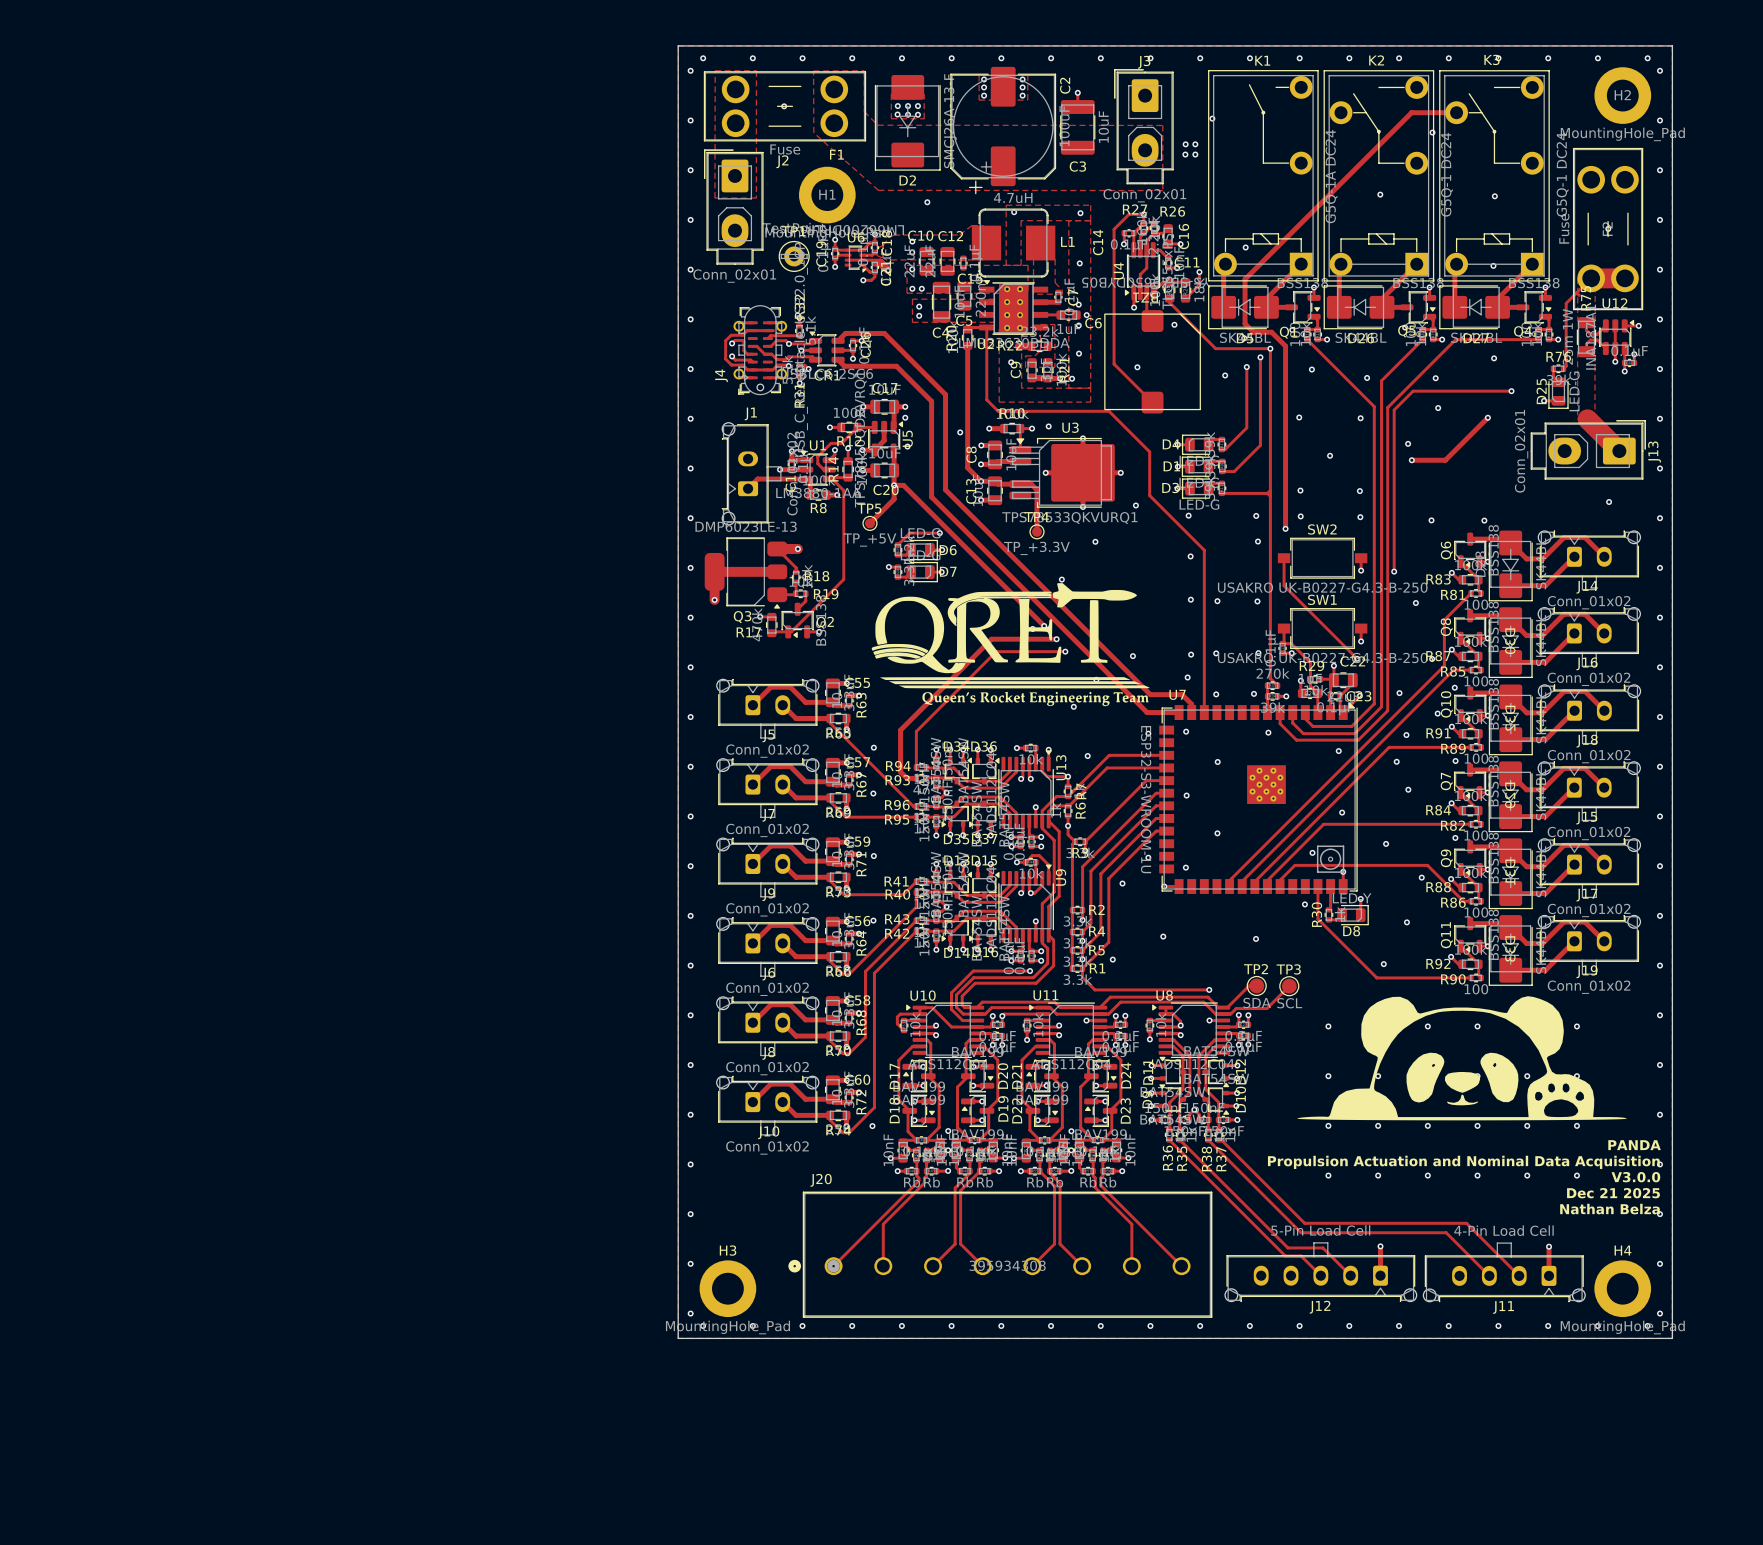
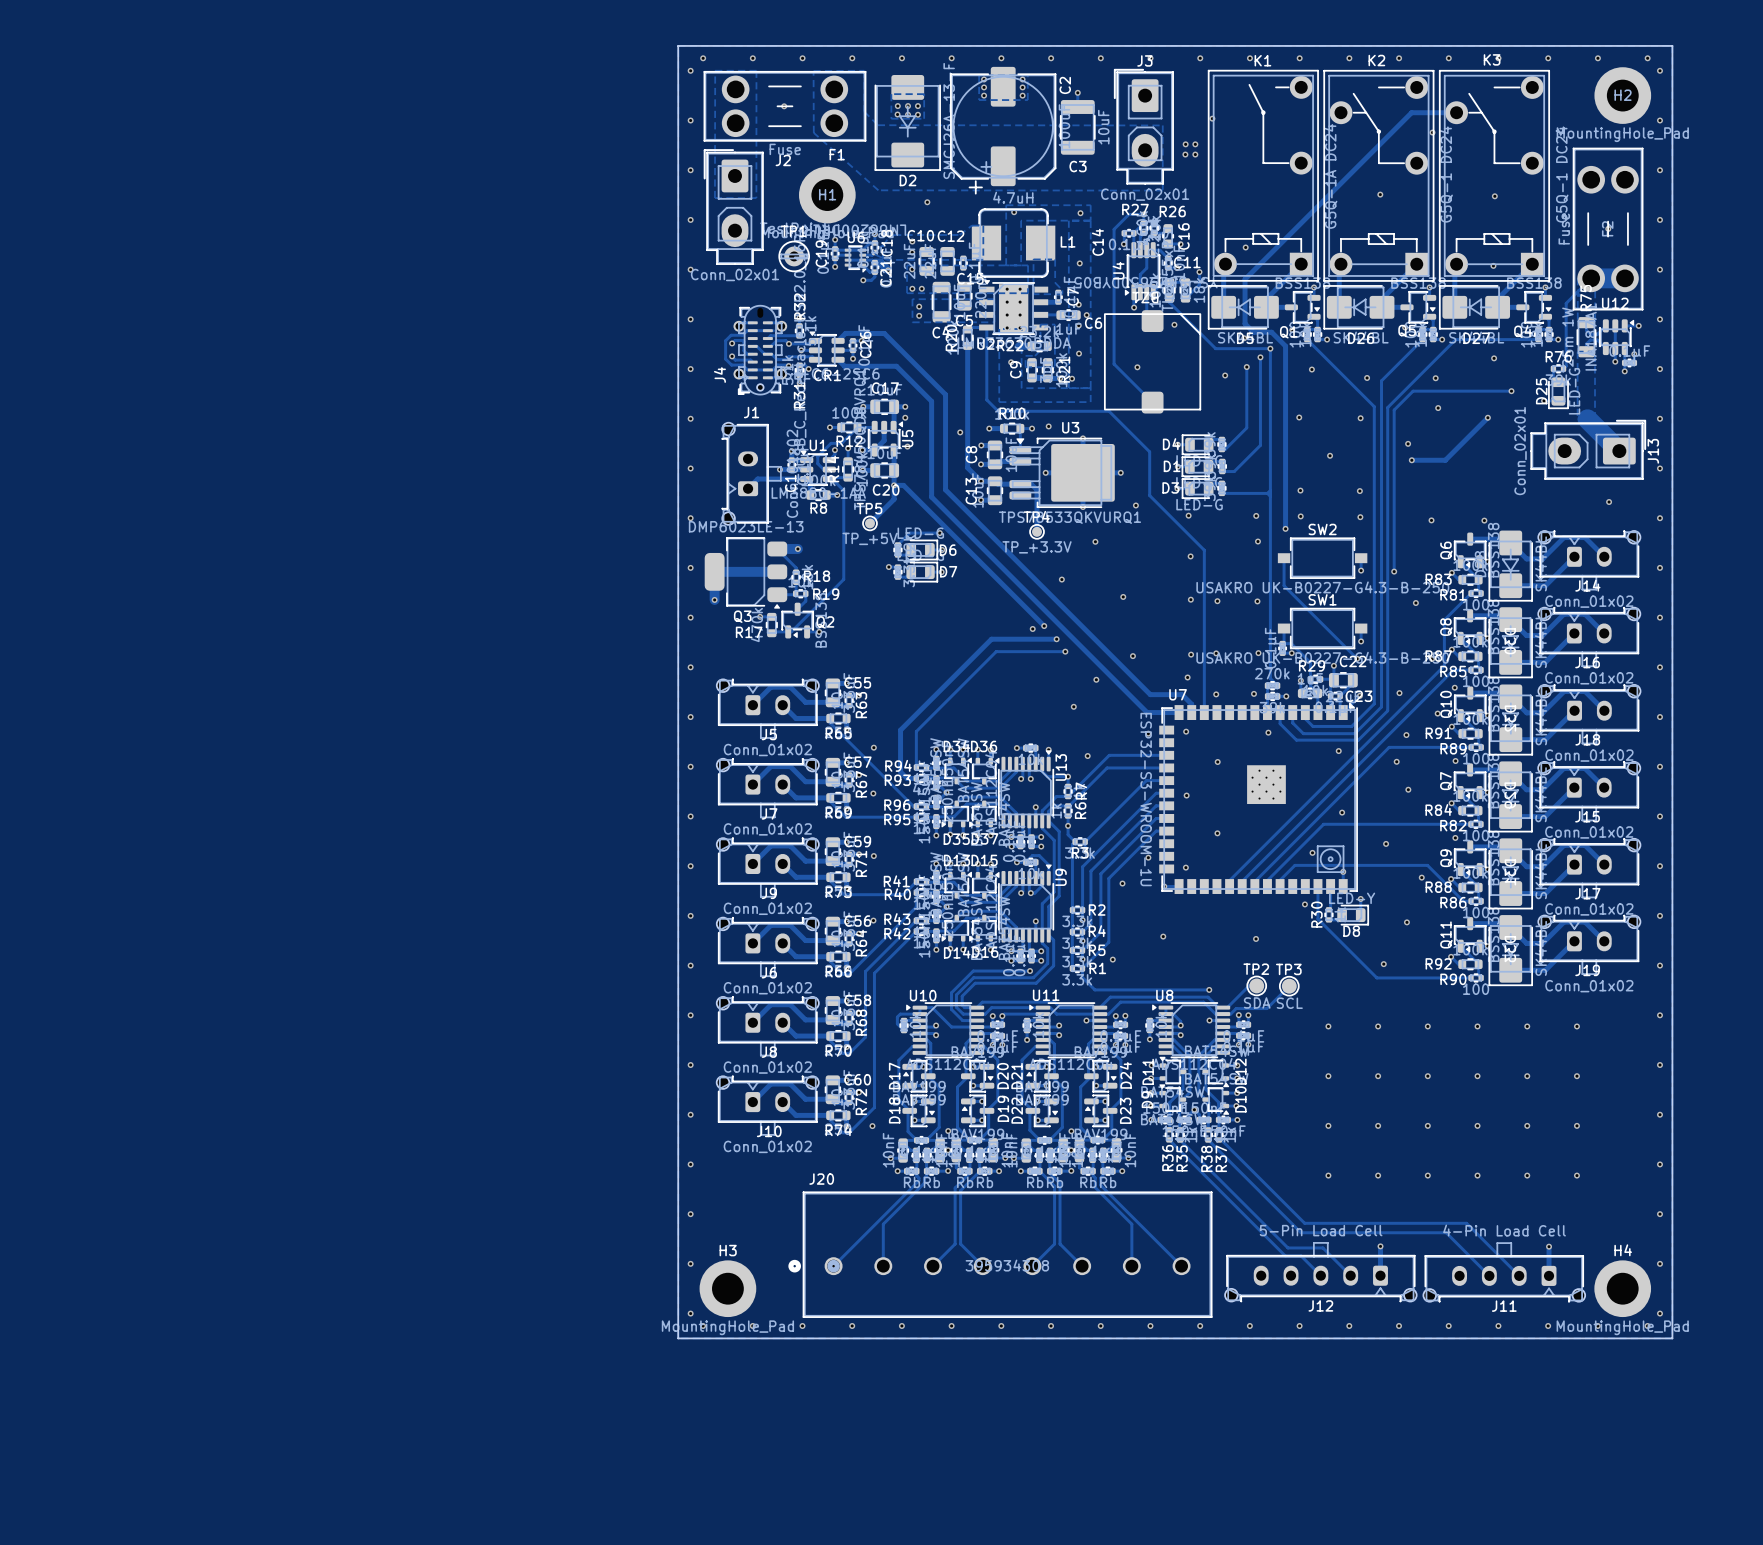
drawing: [871, 583, 1150, 707] -> none
drawing: [1297, 996, 1627, 1121] -> none
text: PANDA (1634, 1145) -> none
text: Propulsion Actuation and Nominal Data Acquisition (1463, 1162) -> none
text: V3.0.0 (1635, 1177) -> none
text: Dec 21 2025 (1613, 1193) -> none
text: Nathan Belza (1609, 1209) -> none

